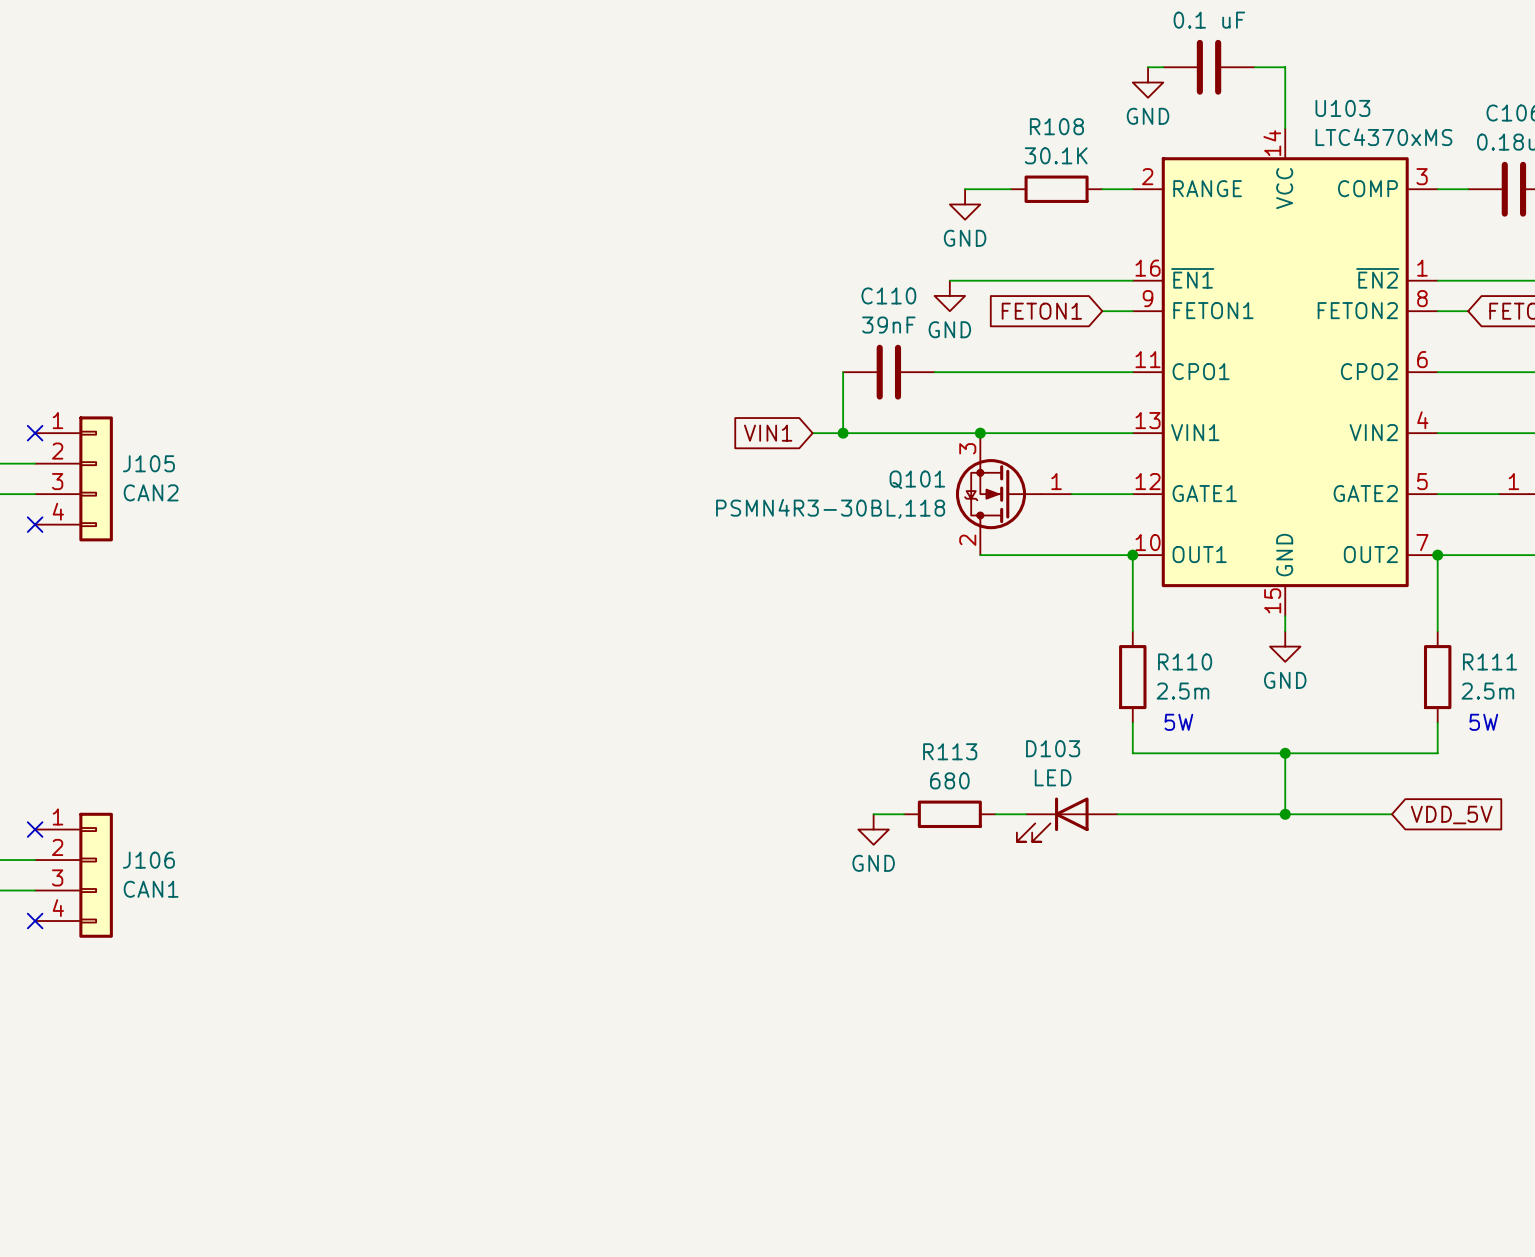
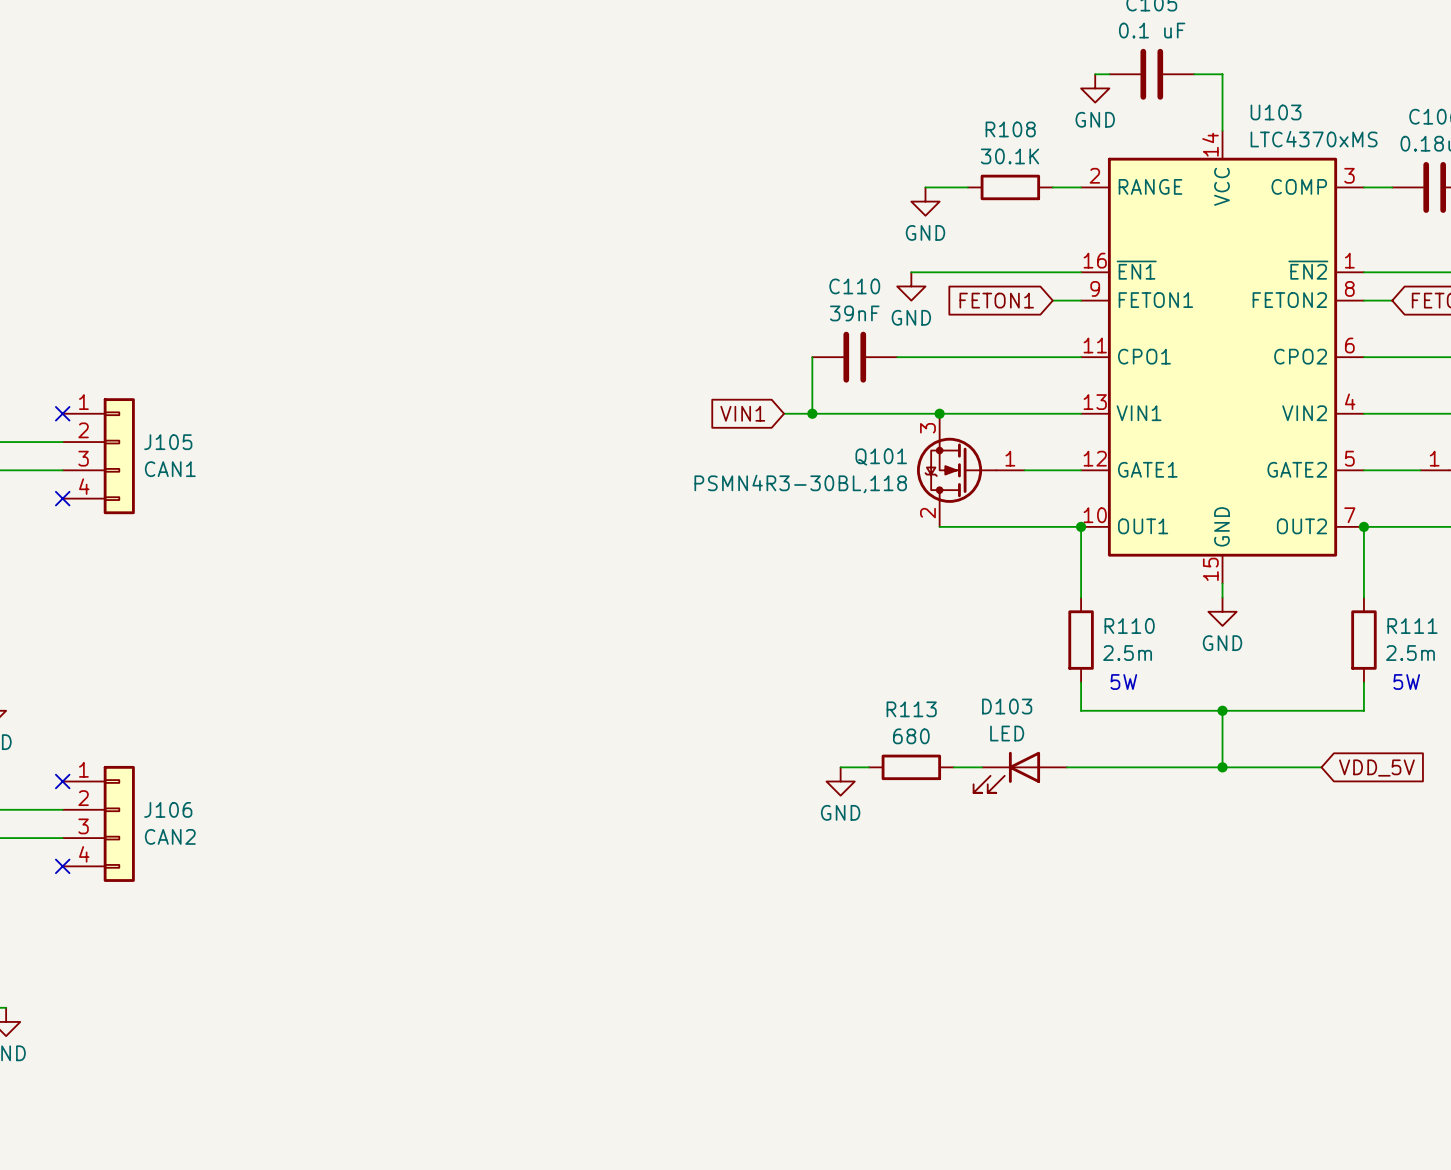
J105 value: CAN2 (151, 492) -> CAN1 (170, 469)
J106 value: CAN1 (151, 889) -> CAN2 (170, 836)

